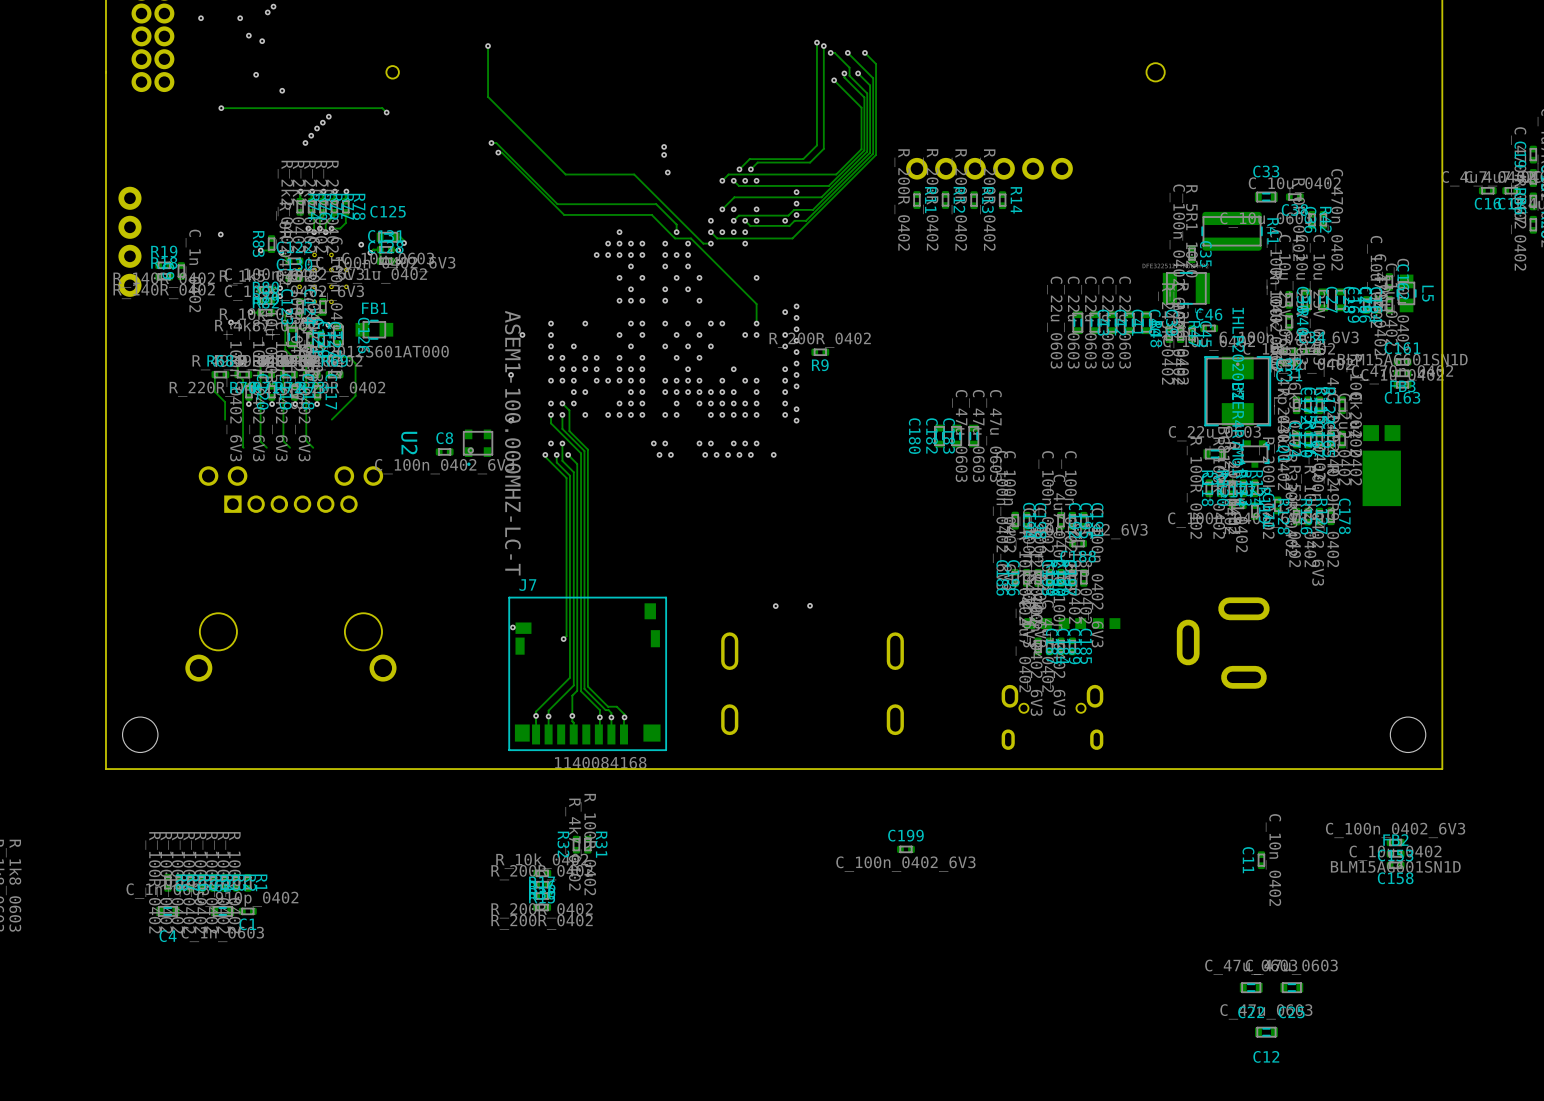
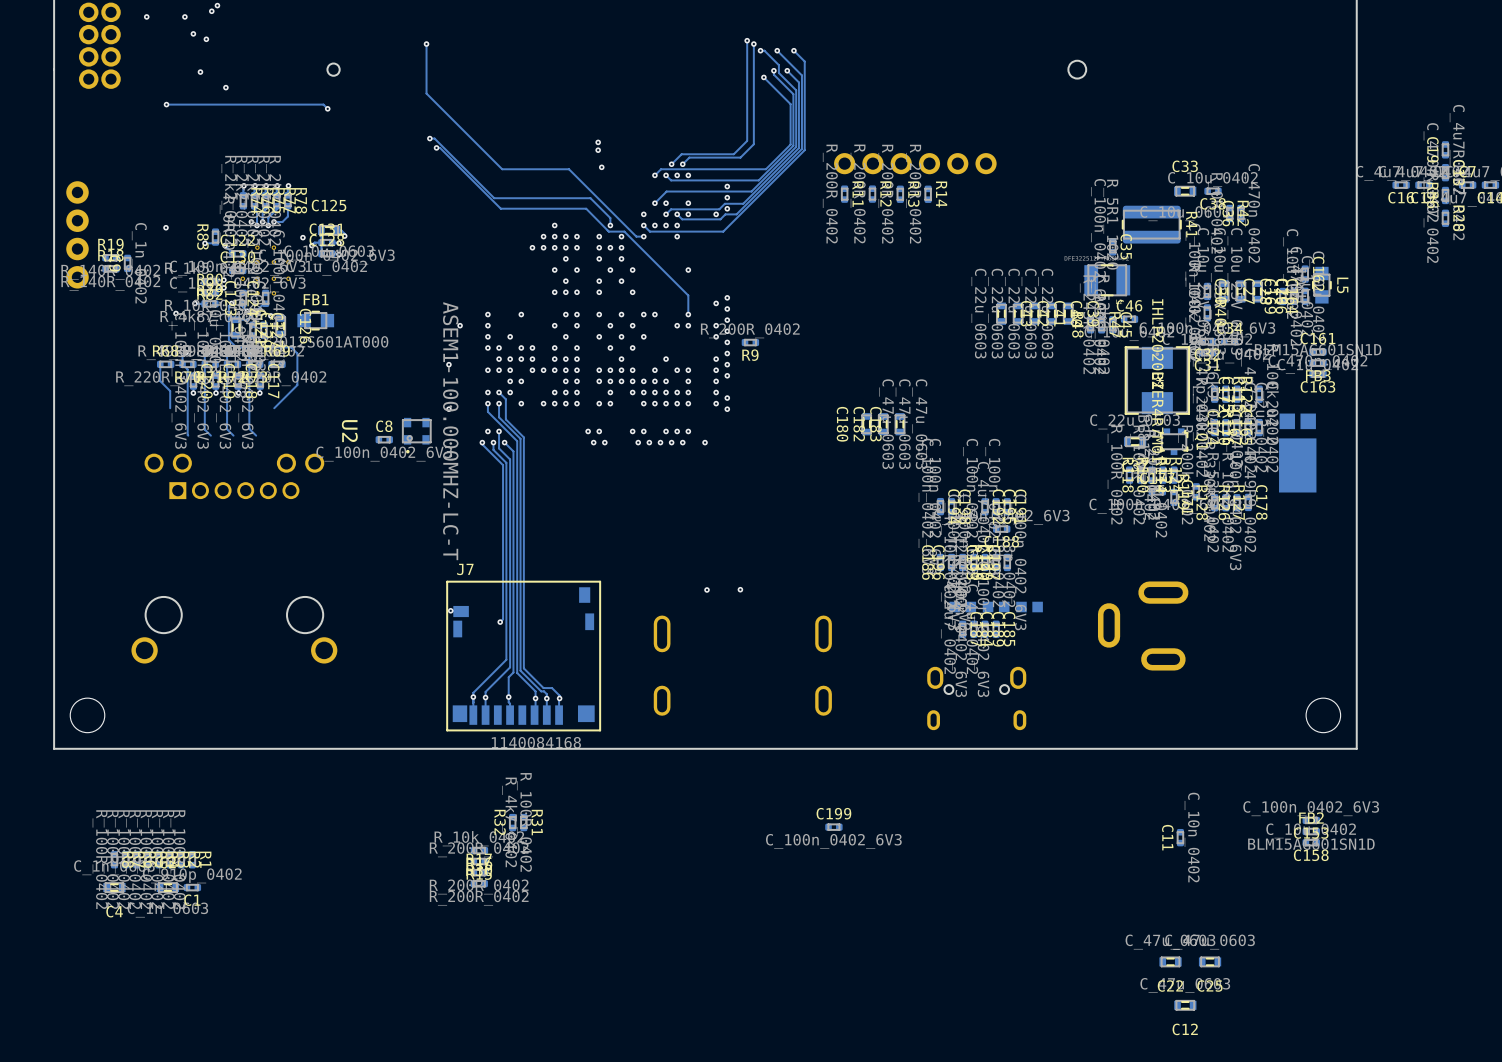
via: (328, 116) -> none
via: (322, 122) -> none
via: (317, 128) -> none
via: (311, 135) -> none
via: (305, 142) -> none

